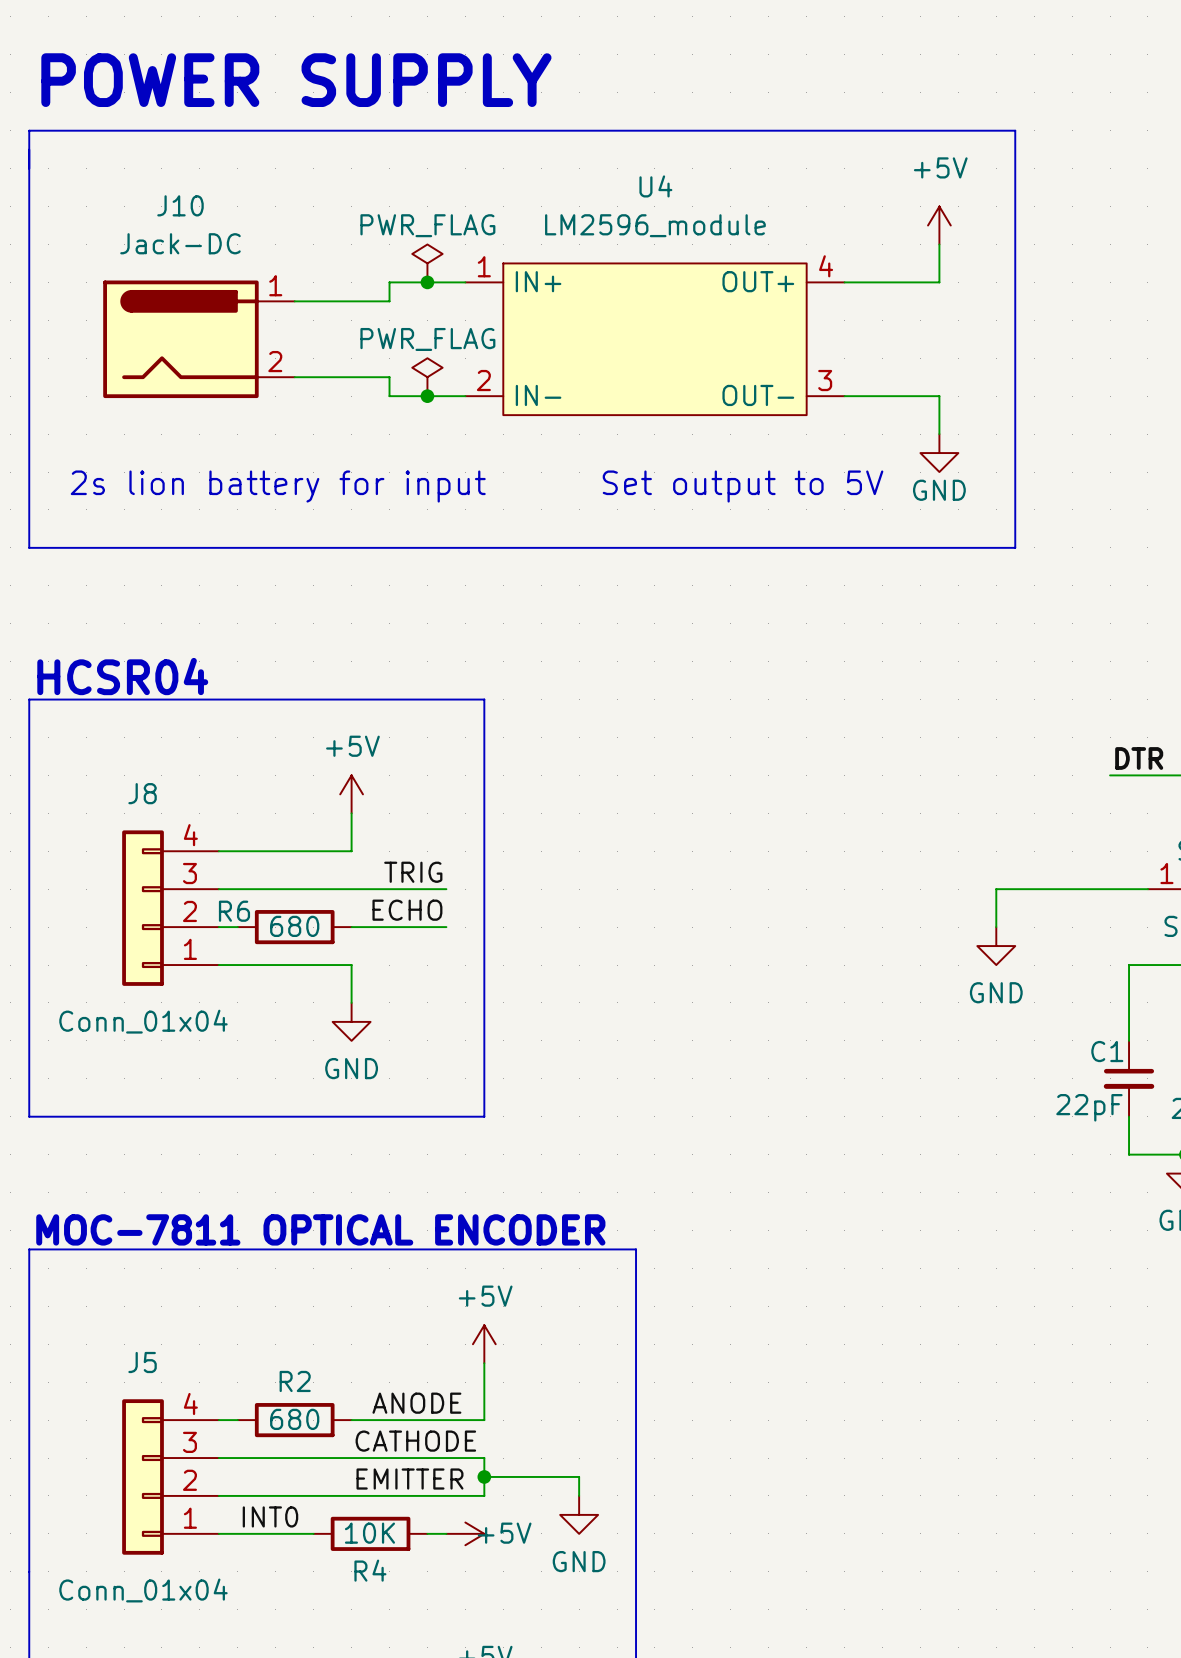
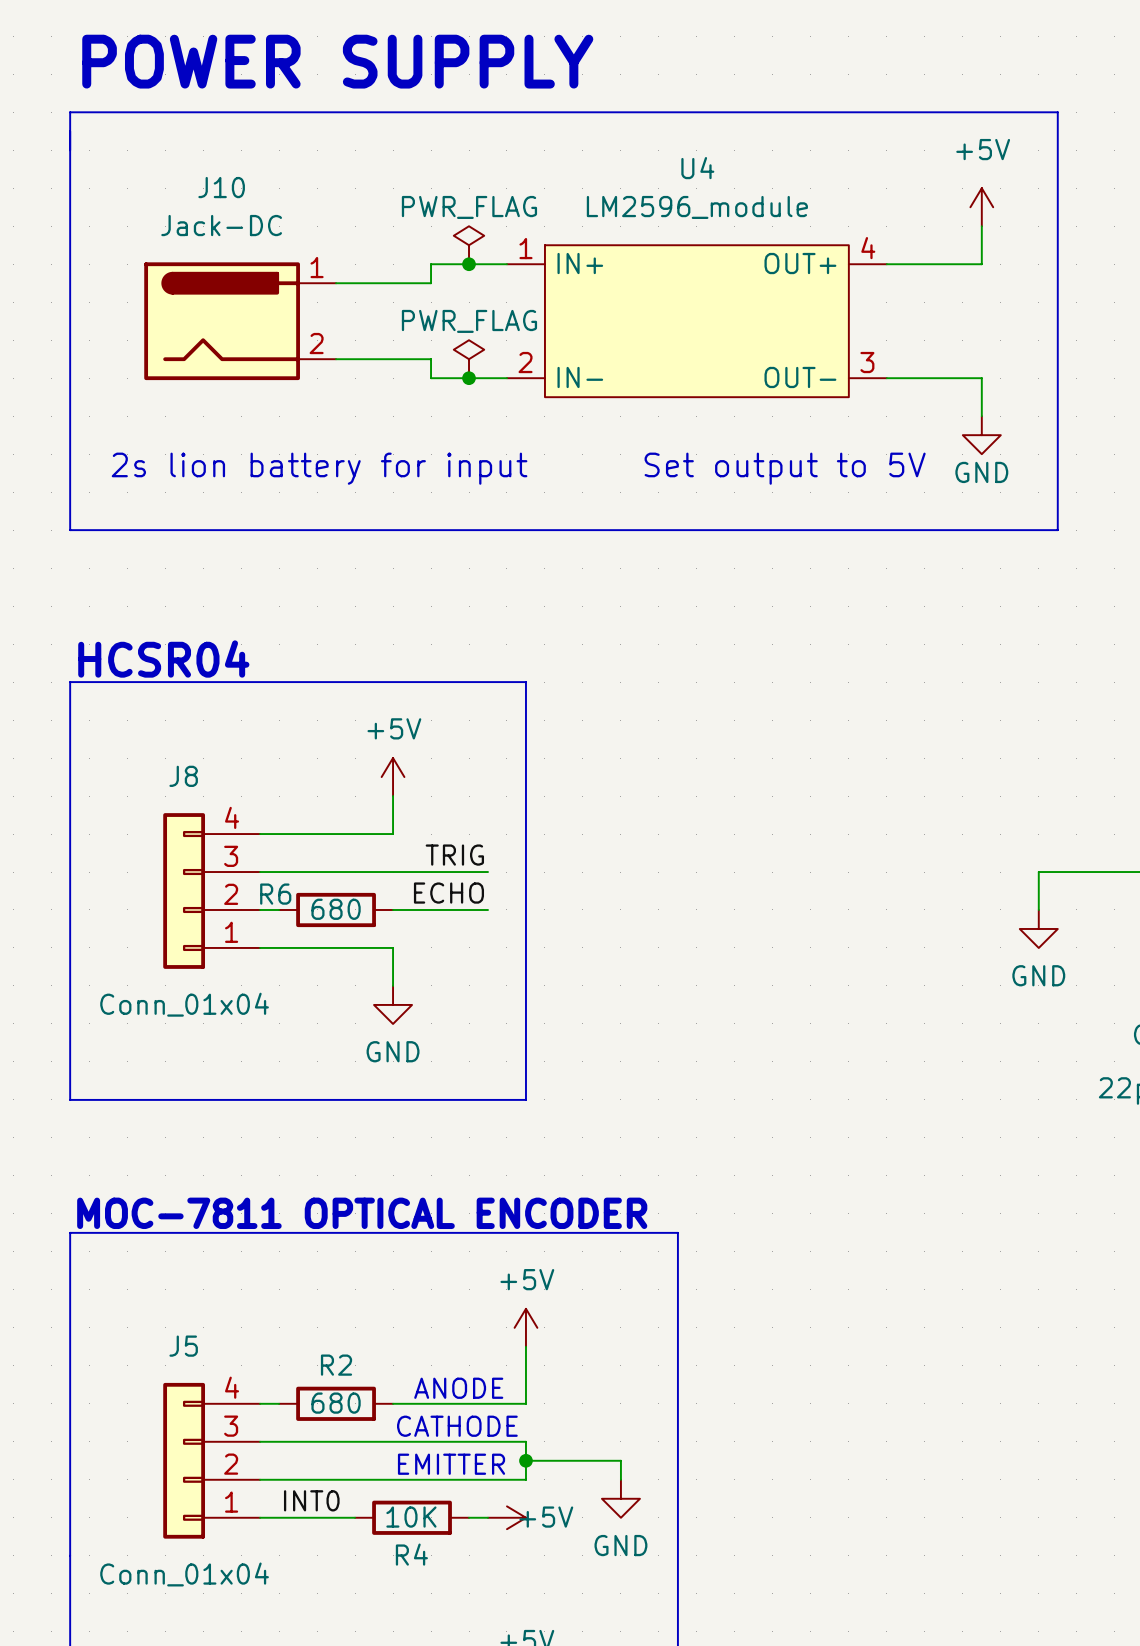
label: ANODE (416, 1403) -> none
text: none -> ANODE (458, 1388)
label: CATHODE (415, 1441) -> none
text: none -> CATHODE (457, 1426)
label: EMITTER (409, 1479) -> none
text: none -> EMITTER (451, 1464)

